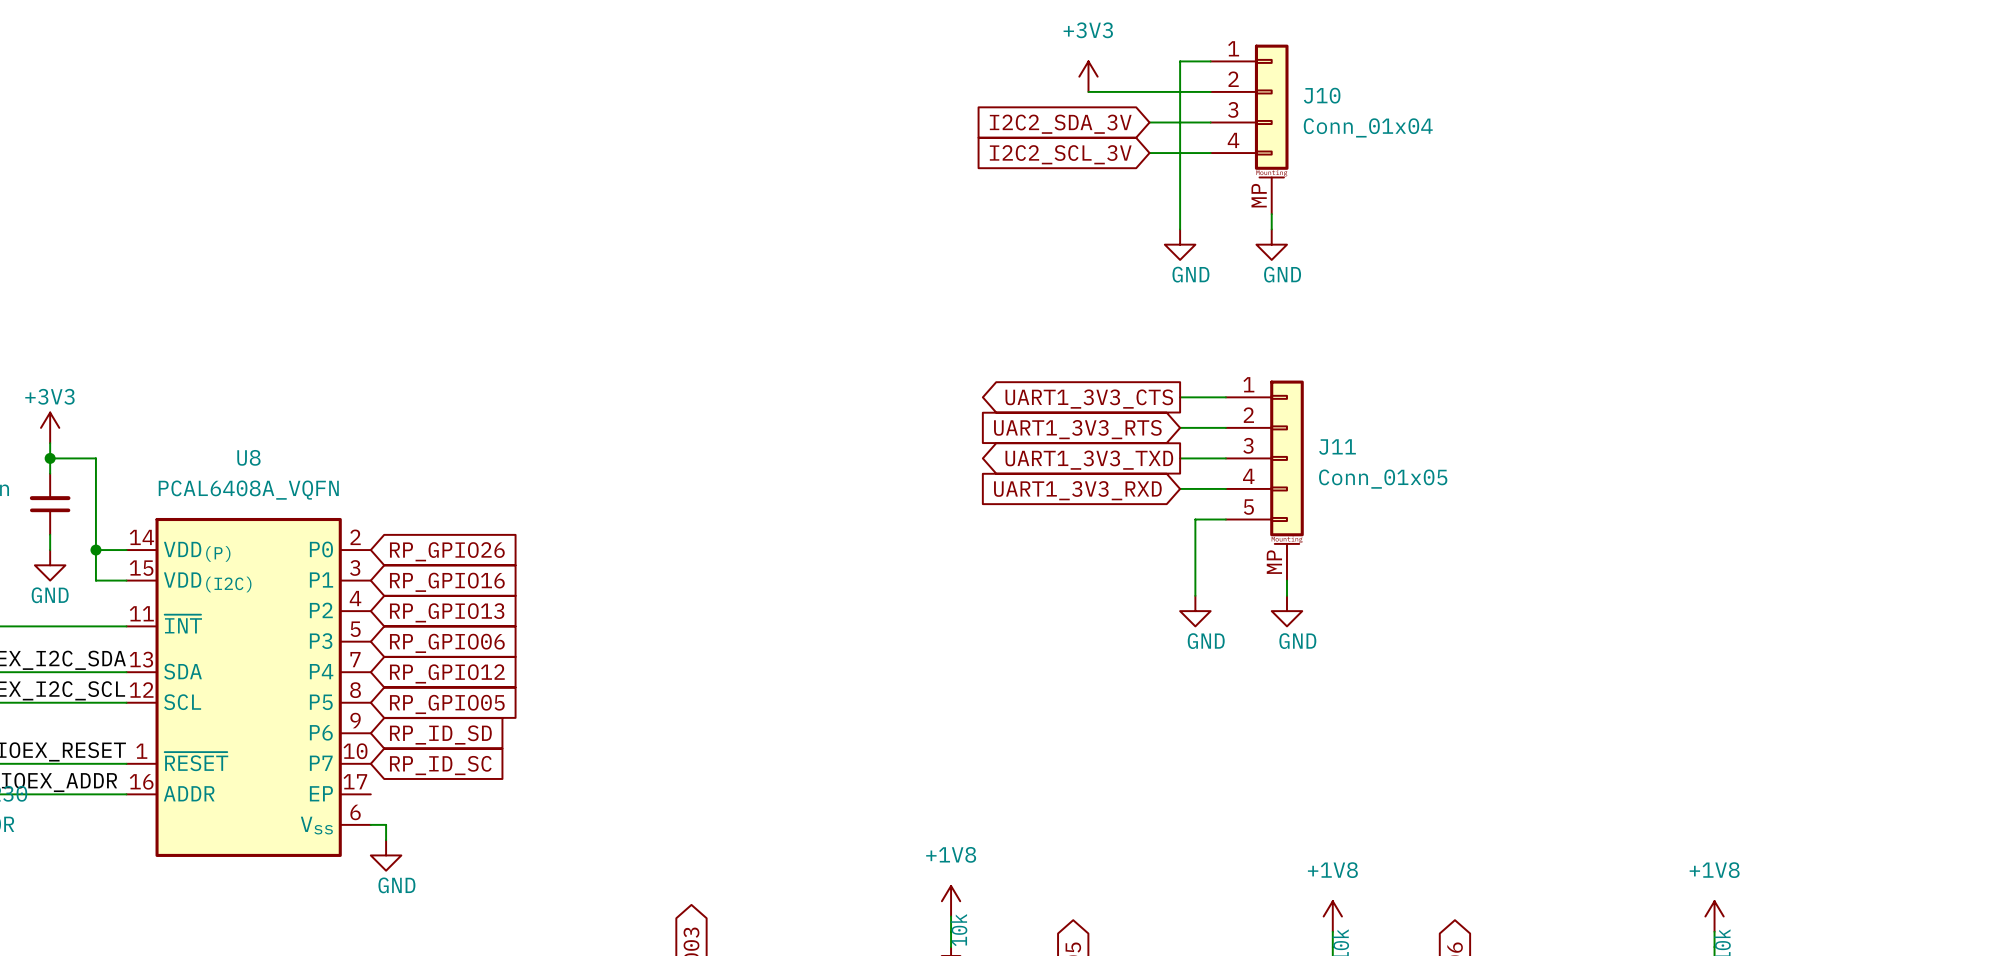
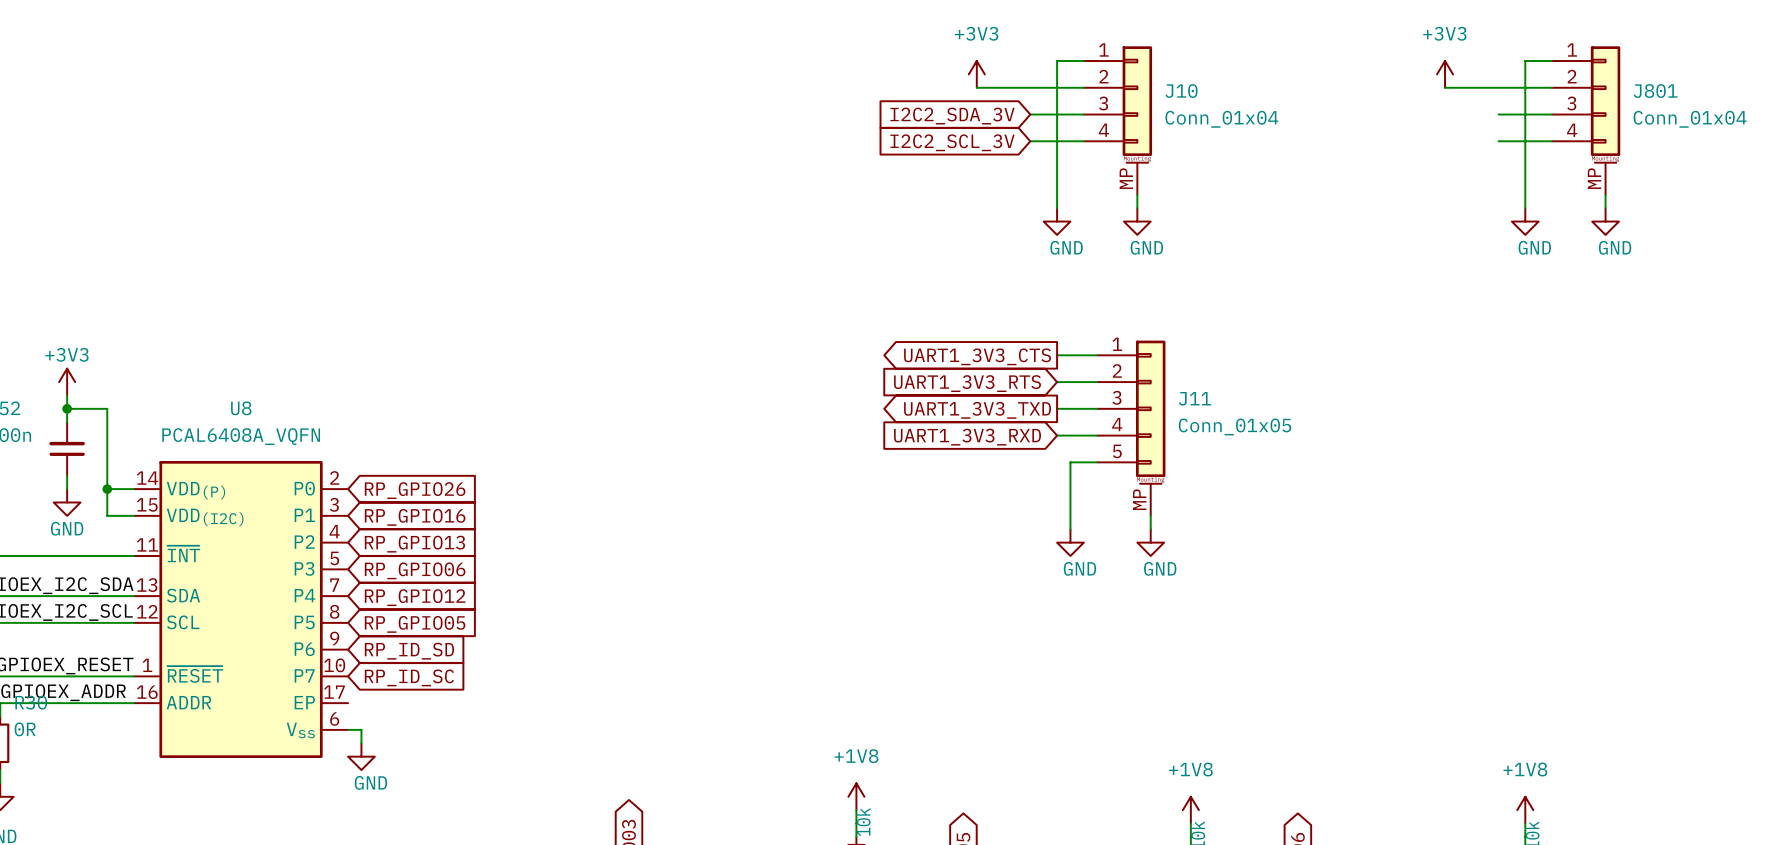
wire: none -> (1552, 61) (1525, 61) (1525, 208)
power symbol: none -> +3V3 (1445, 74)
wire: none -> (1445, 87) (1552, 87)
wire: none -> (1498, 114) (1552, 114)
J801: none -> Conn_01x04 (1586, 120)
wire: none -> (1498, 141) (1552, 141)
wire: none -> (1605, 194) (1605, 208)
power symbol: none -> GND (1525, 221)
power symbol: none -> GND (1605, 221)

